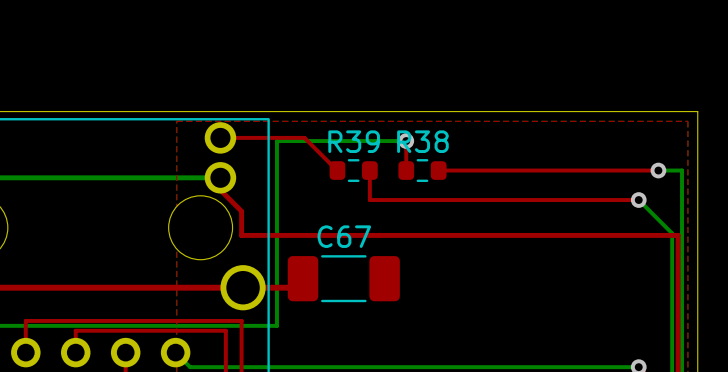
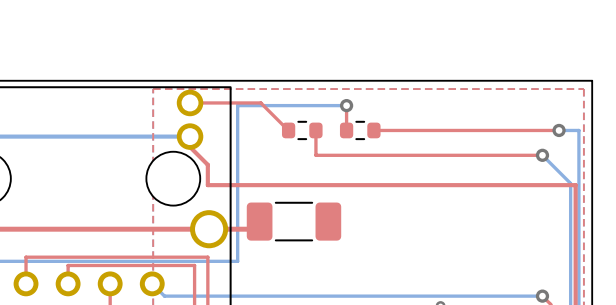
R39 name: R39 (354, 141) -> none
R38 name: R38 (422, 141) -> none
C67 name: C67 (344, 236) -> none

